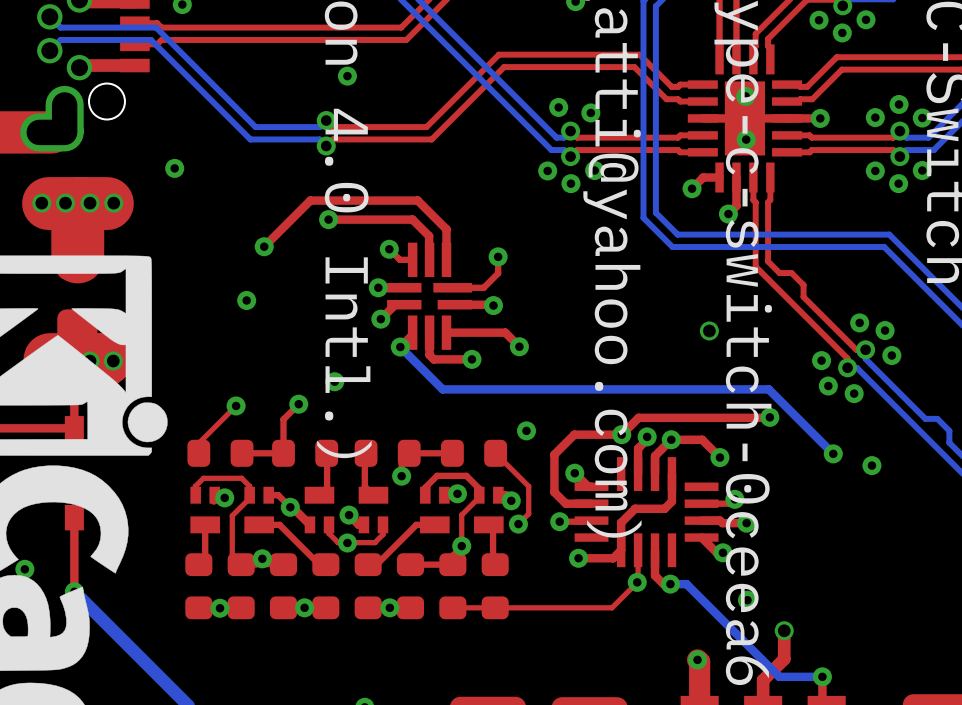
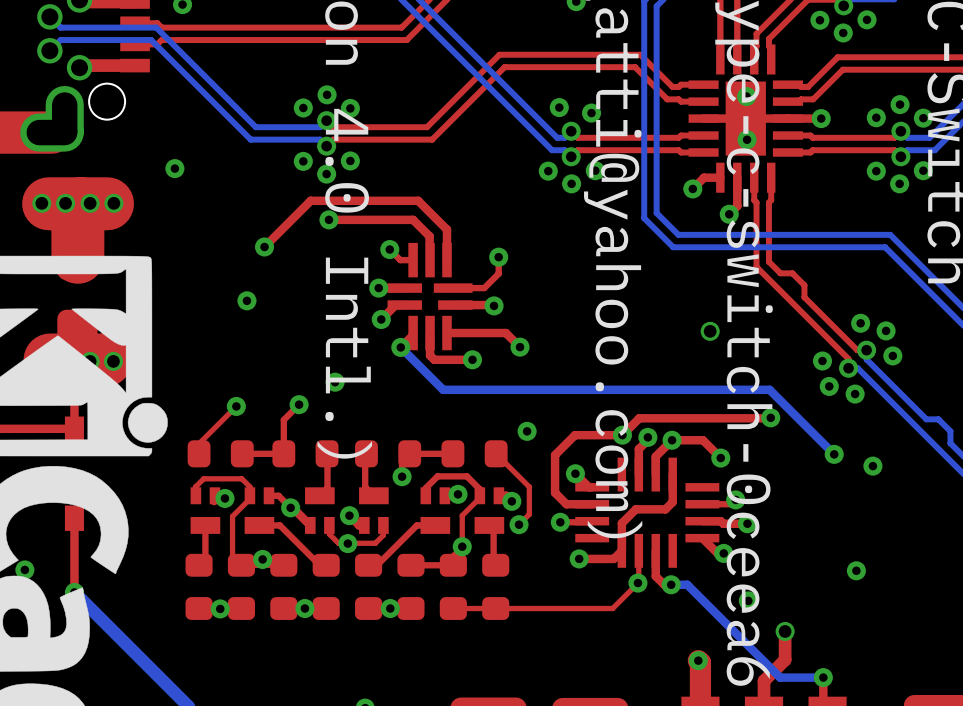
via: (347, 76) -> none
via: none -> (327, 94)
via: none -> (303, 107)
via: none -> (350, 108)
via: none -> (350, 160)
via: none -> (303, 161)
via: none -> (326, 174)
via: none -> (856, 570)

